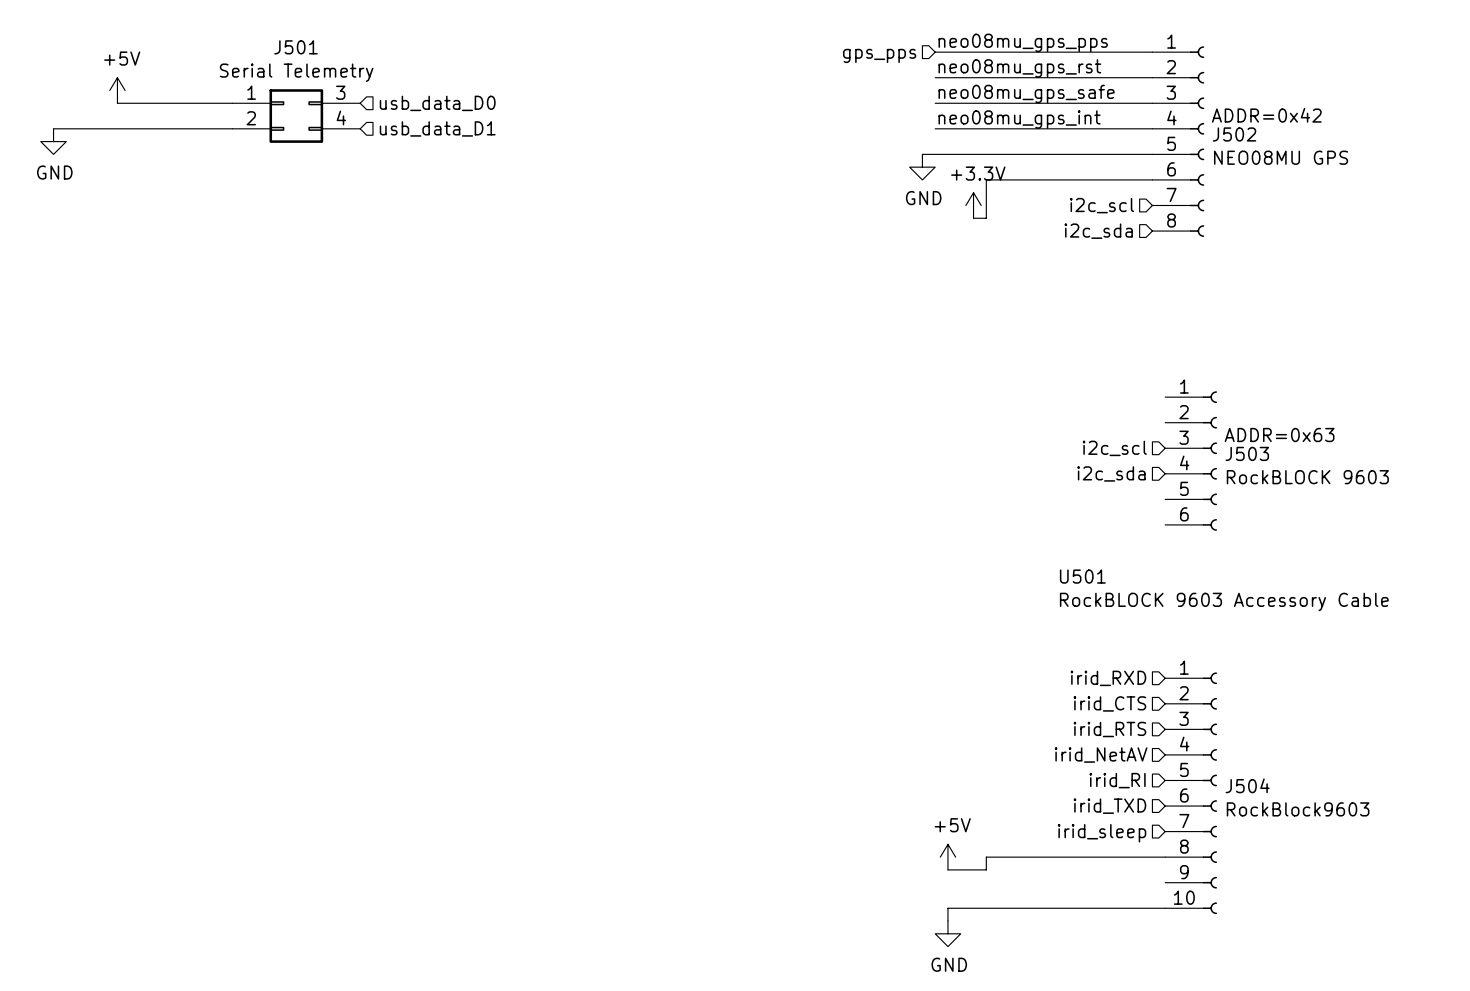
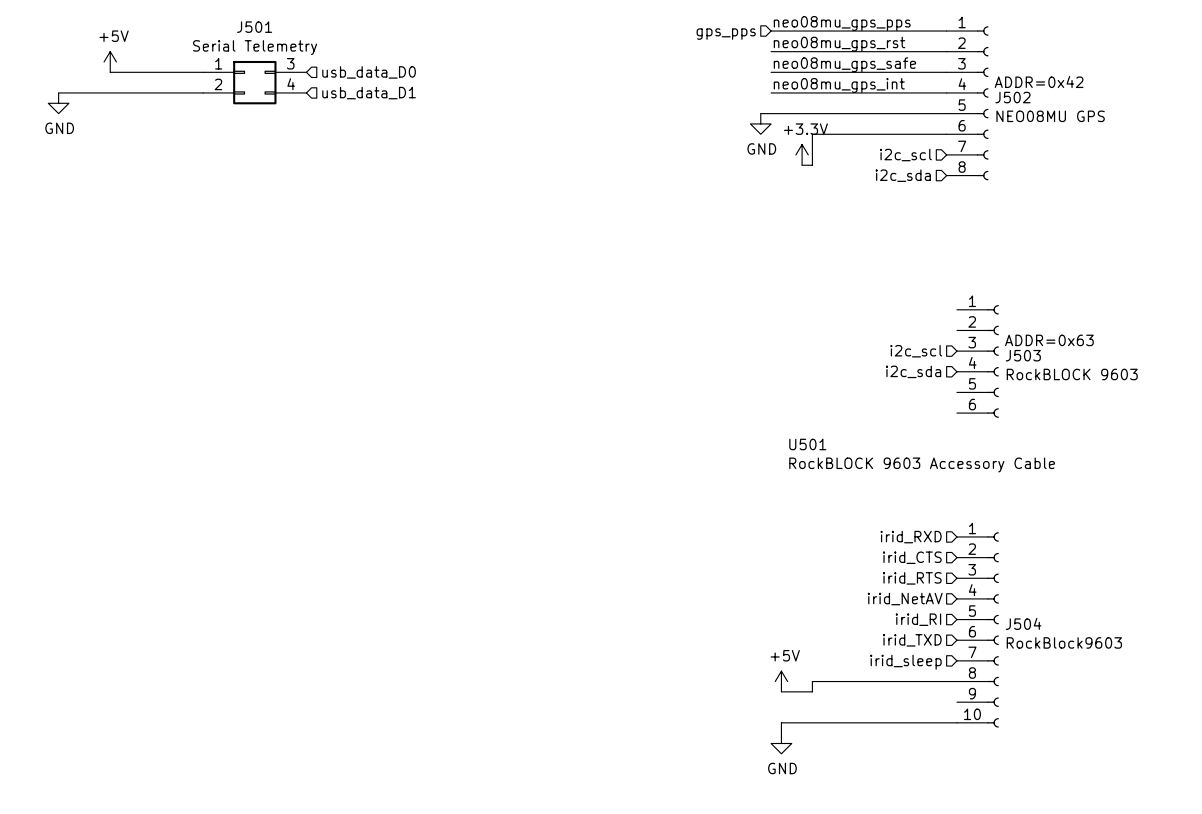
U501 position: (1224, 590) -> (922, 455)

